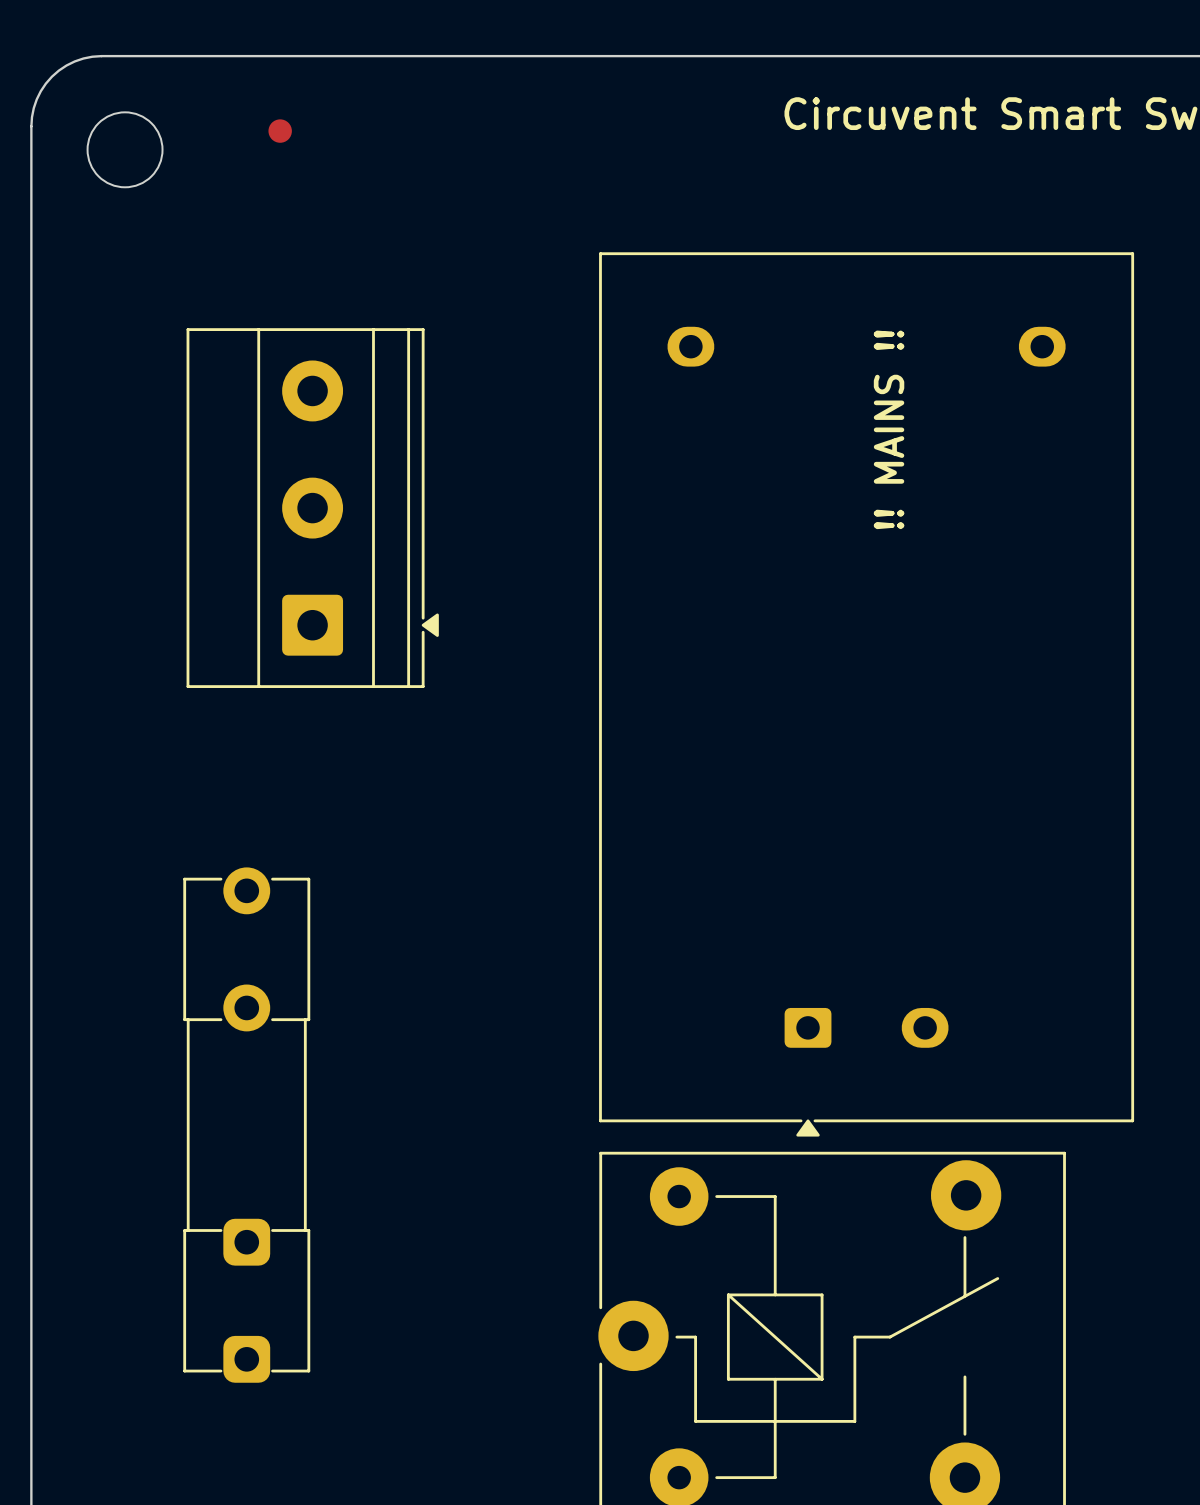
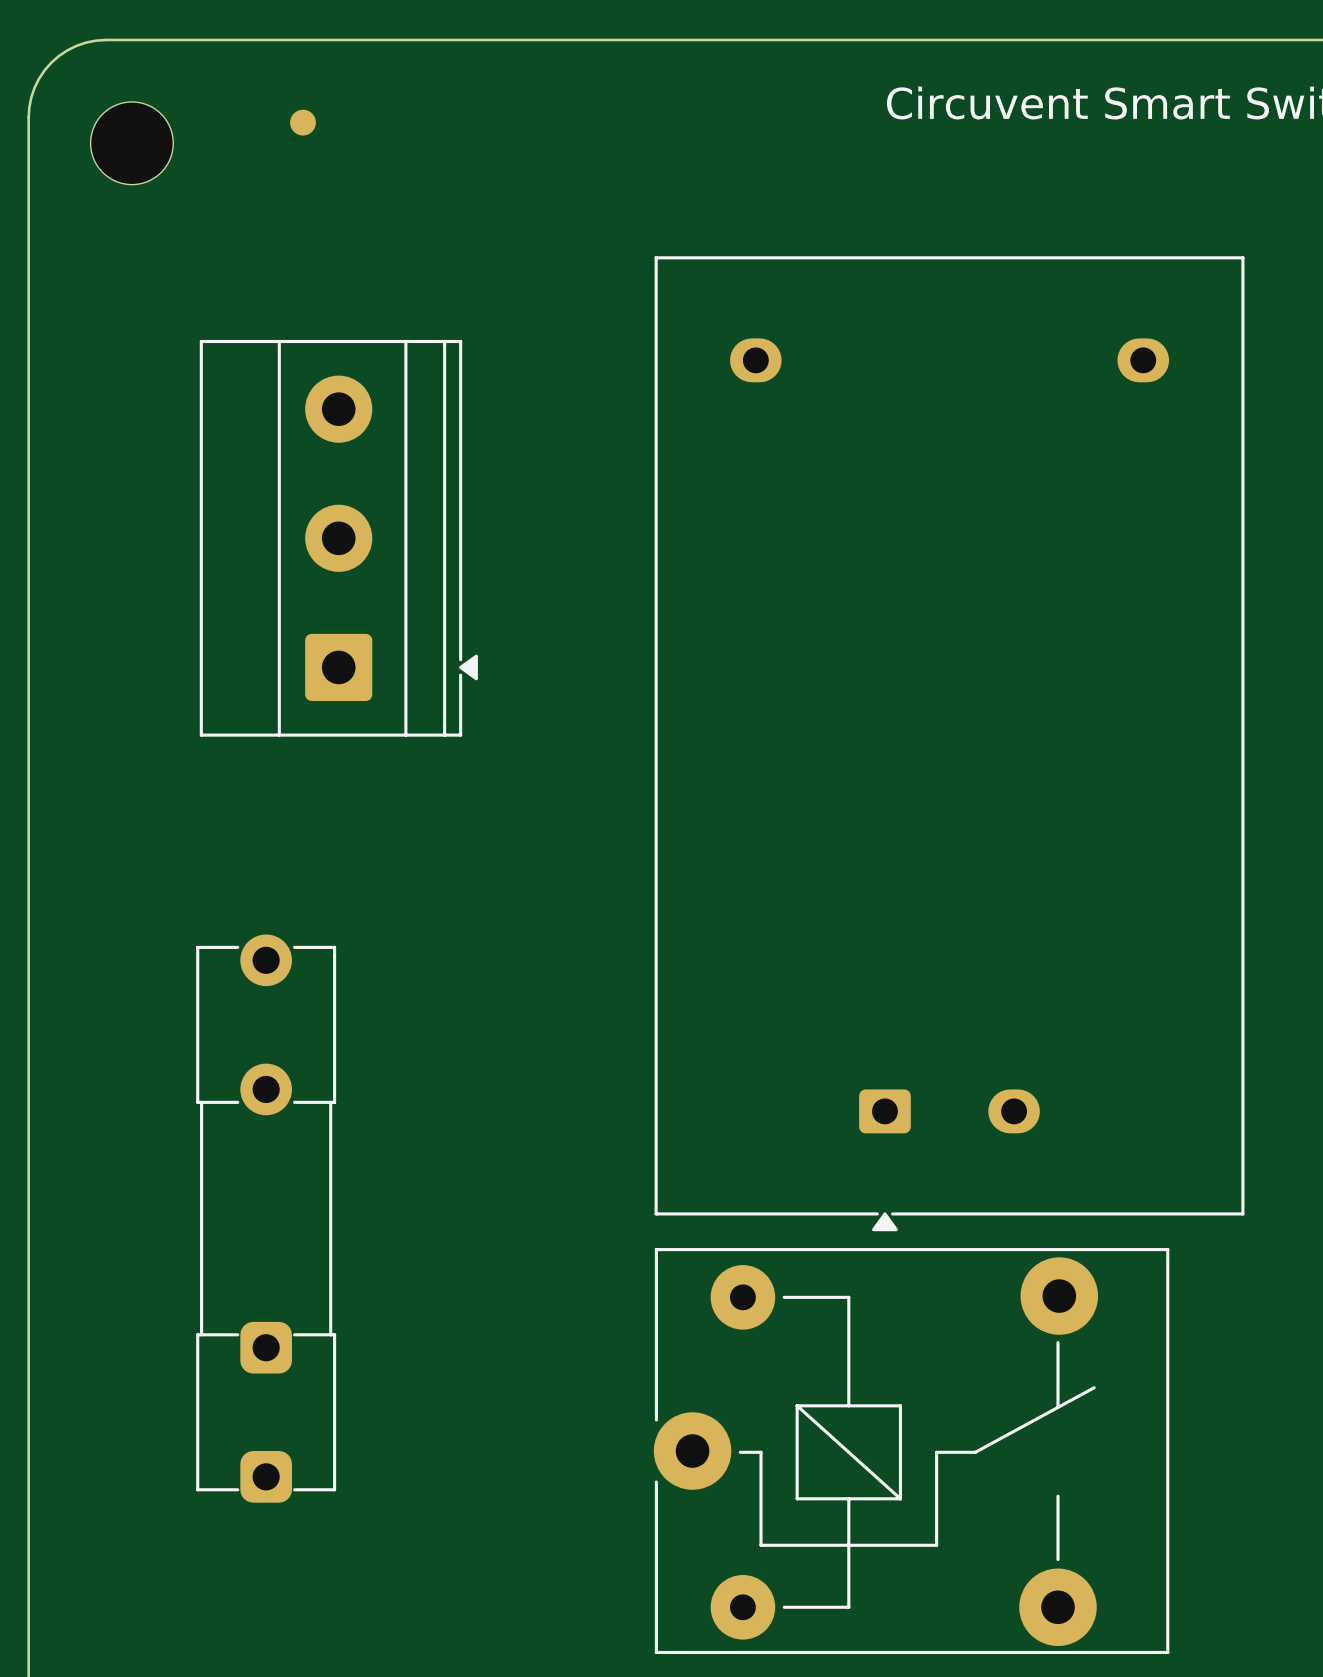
text: !! MAINS !! (889, 429) -> none

